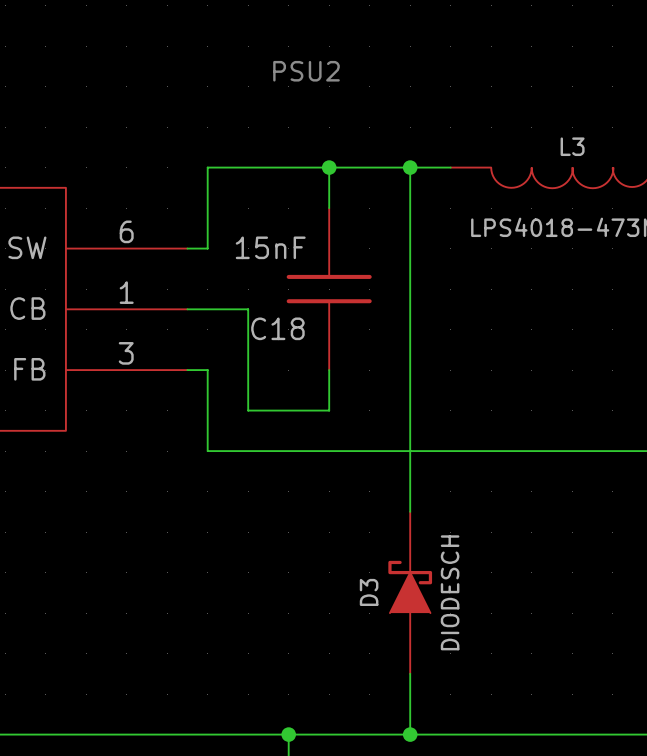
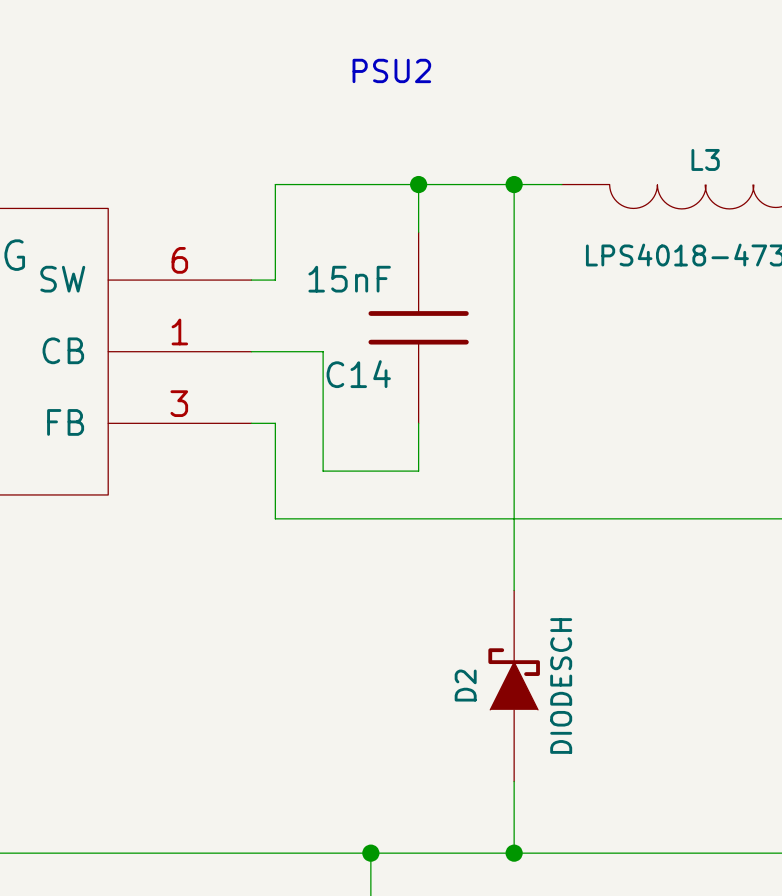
C18 name: C18 (277, 328) -> C14 (358, 374)
D3 name: D3 (369, 592) -> D2 (465, 685)

